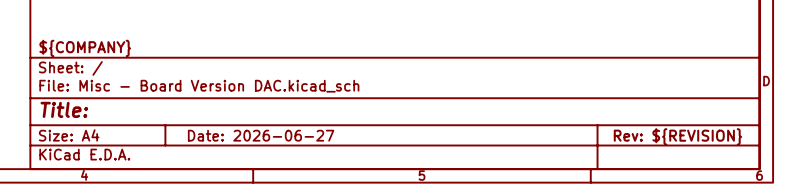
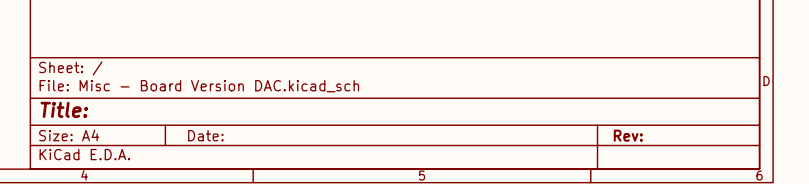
title block: ${COMPANY} (85, 48) -> none
title block: Date: 2026-06-27 (261, 135) -> Date: (205, 135)
title block: Rev: ${REVISION} (677, 136) -> Rev: (628, 135)

